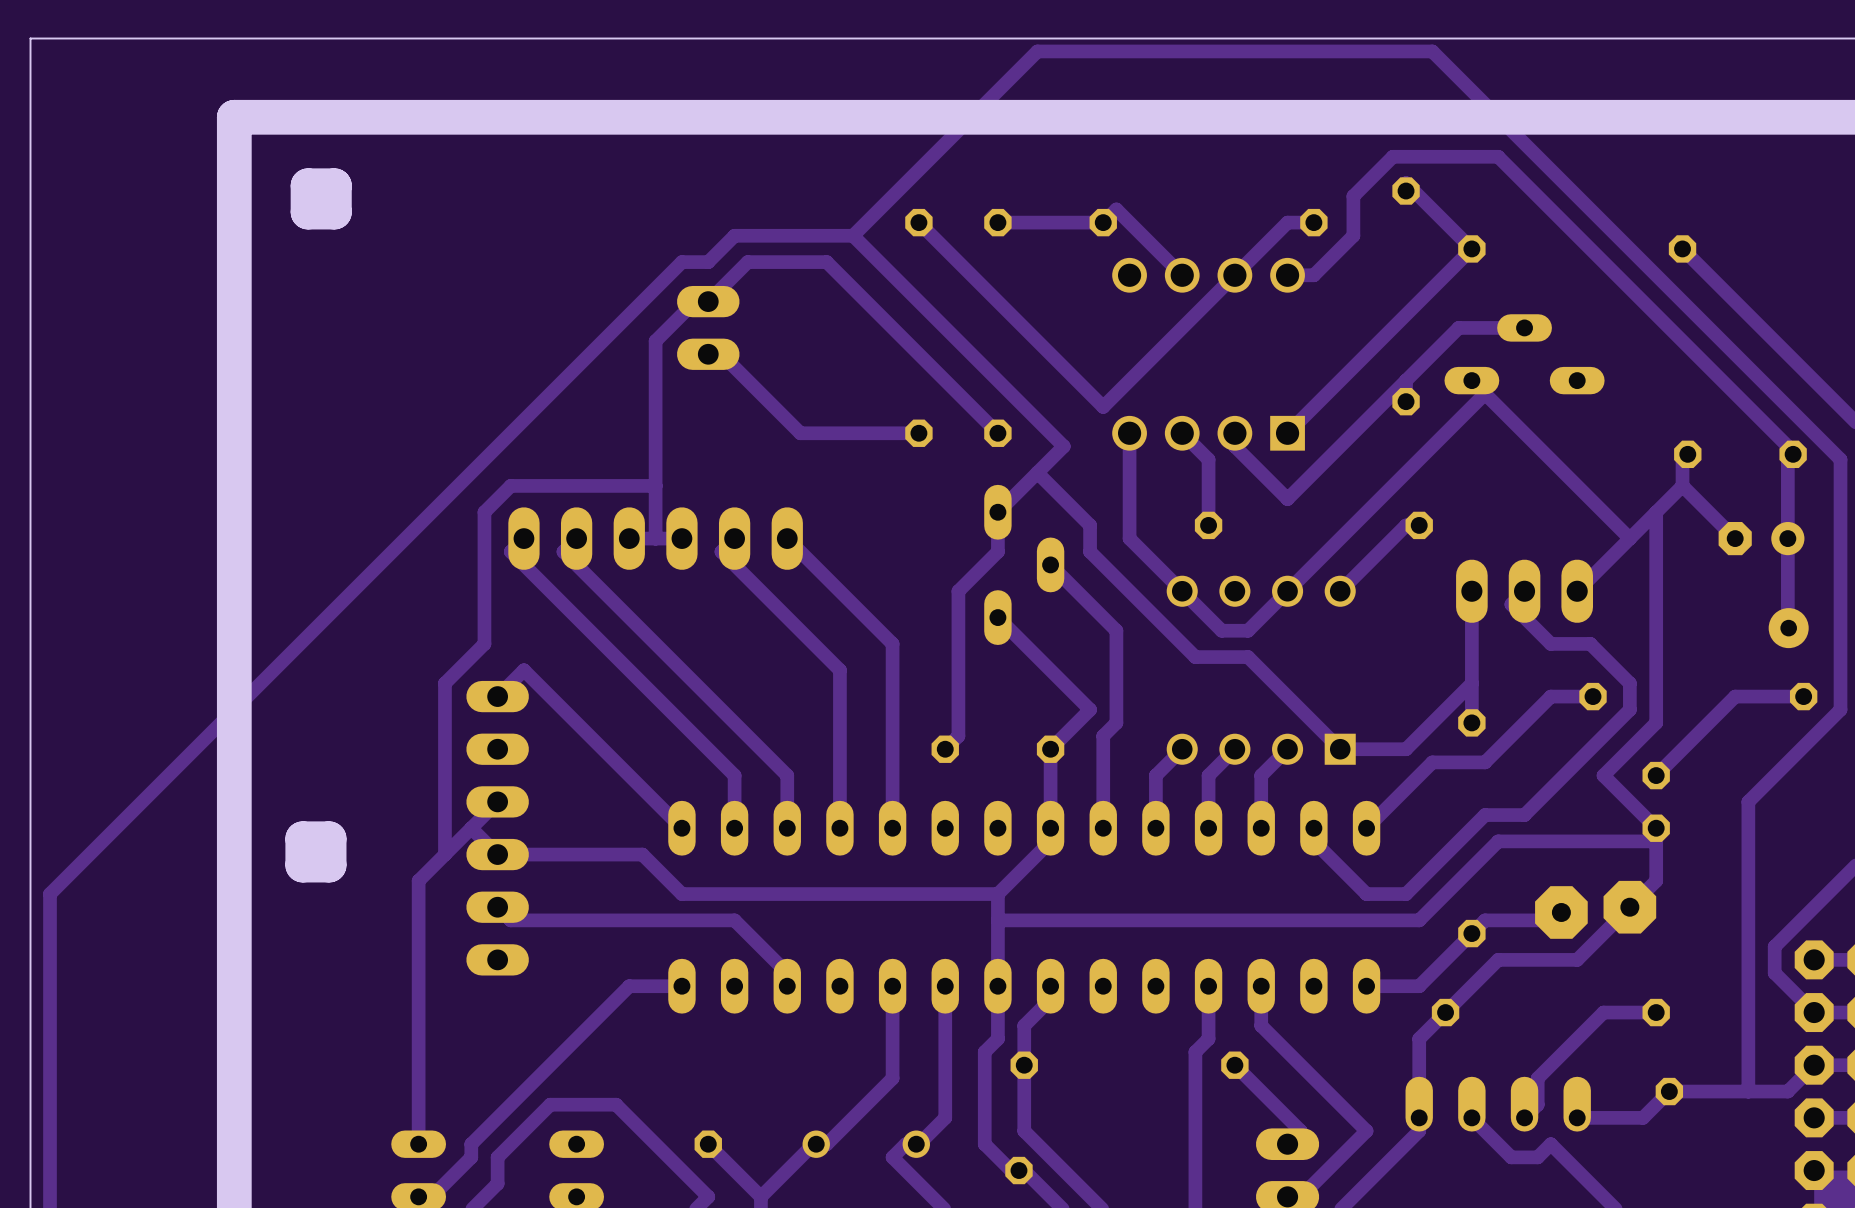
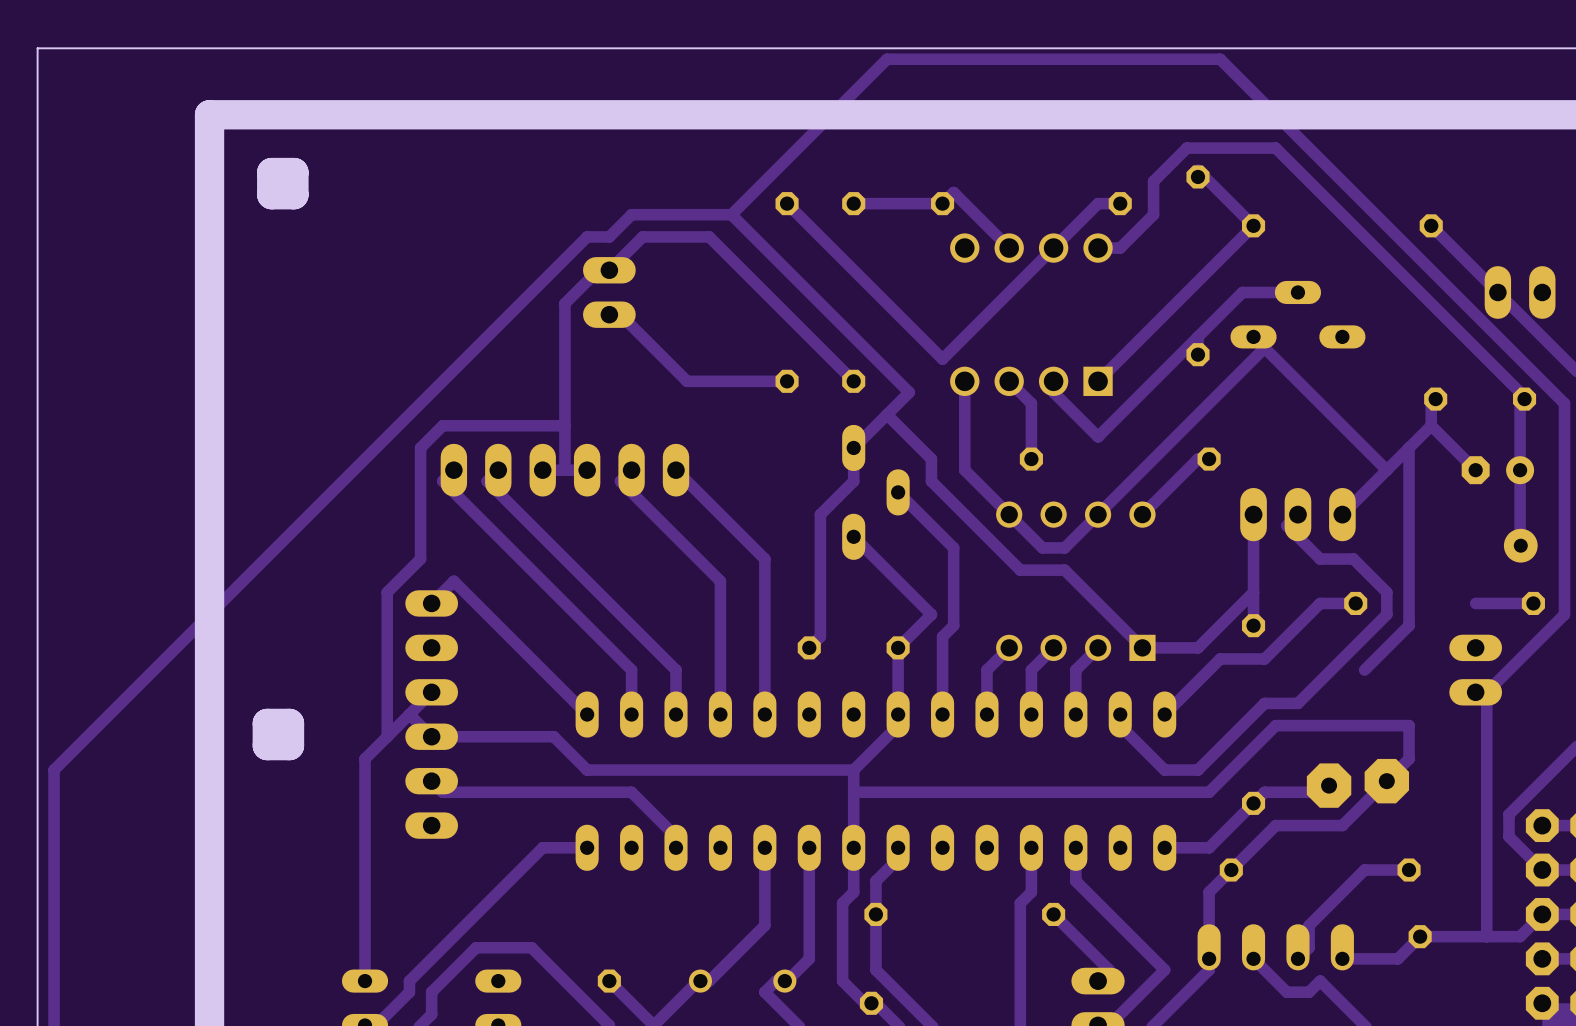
part: none -> (1520, 292)
track: (1735, 696) (1656, 775) -> none
track: (1603, 775) (1656, 828) (1656, 841) -> none
part: none -> (1475, 670)
part: (1656, 801) -> none

